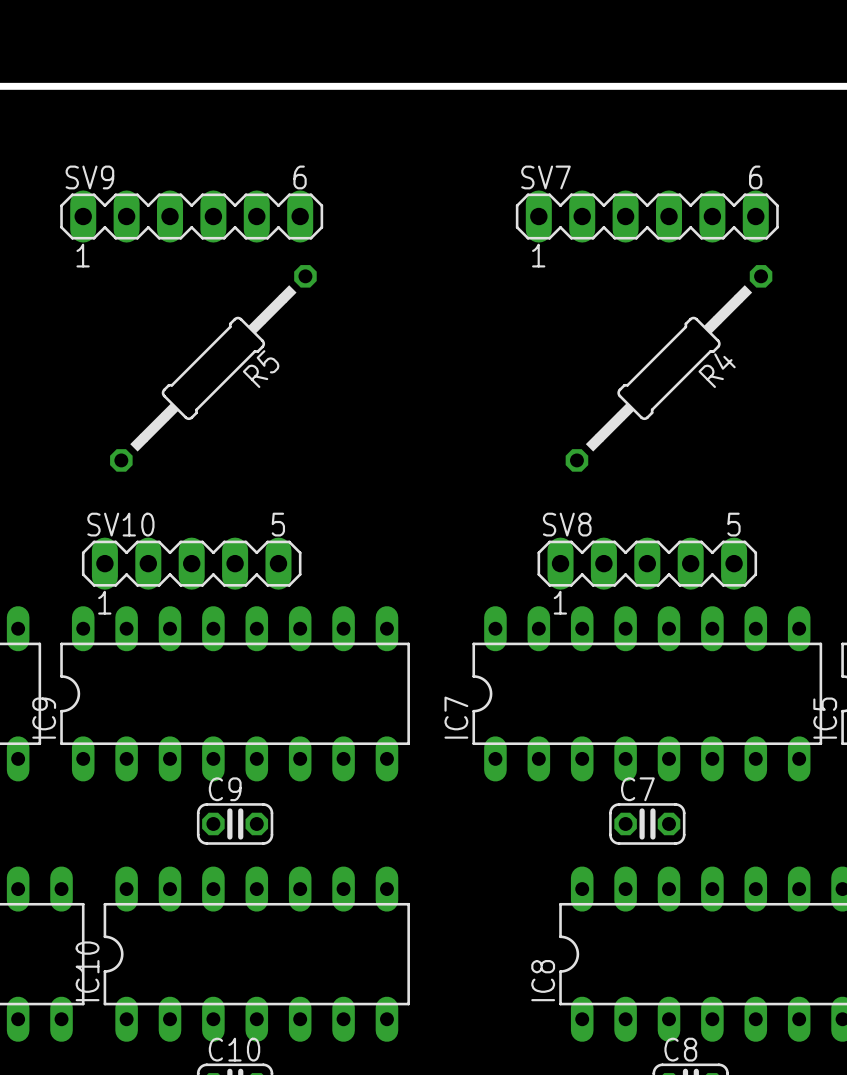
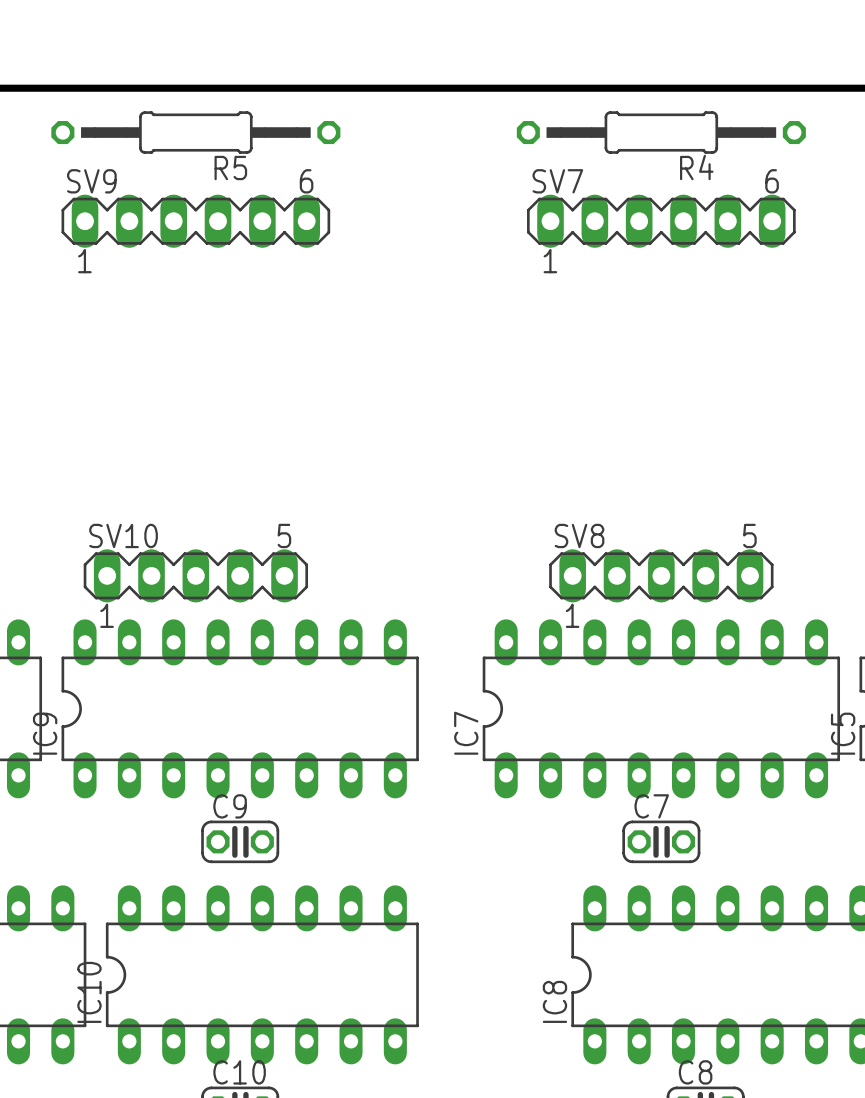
R5 rotation: 0° (213, 368) -> 45° clockwise (195, 132)
R5 position: (213, 368) -> (195, 132)
R4 rotation: 0° (669, 368) -> 45° clockwise (661, 132)
R4 position: (669, 368) -> (661, 132)

